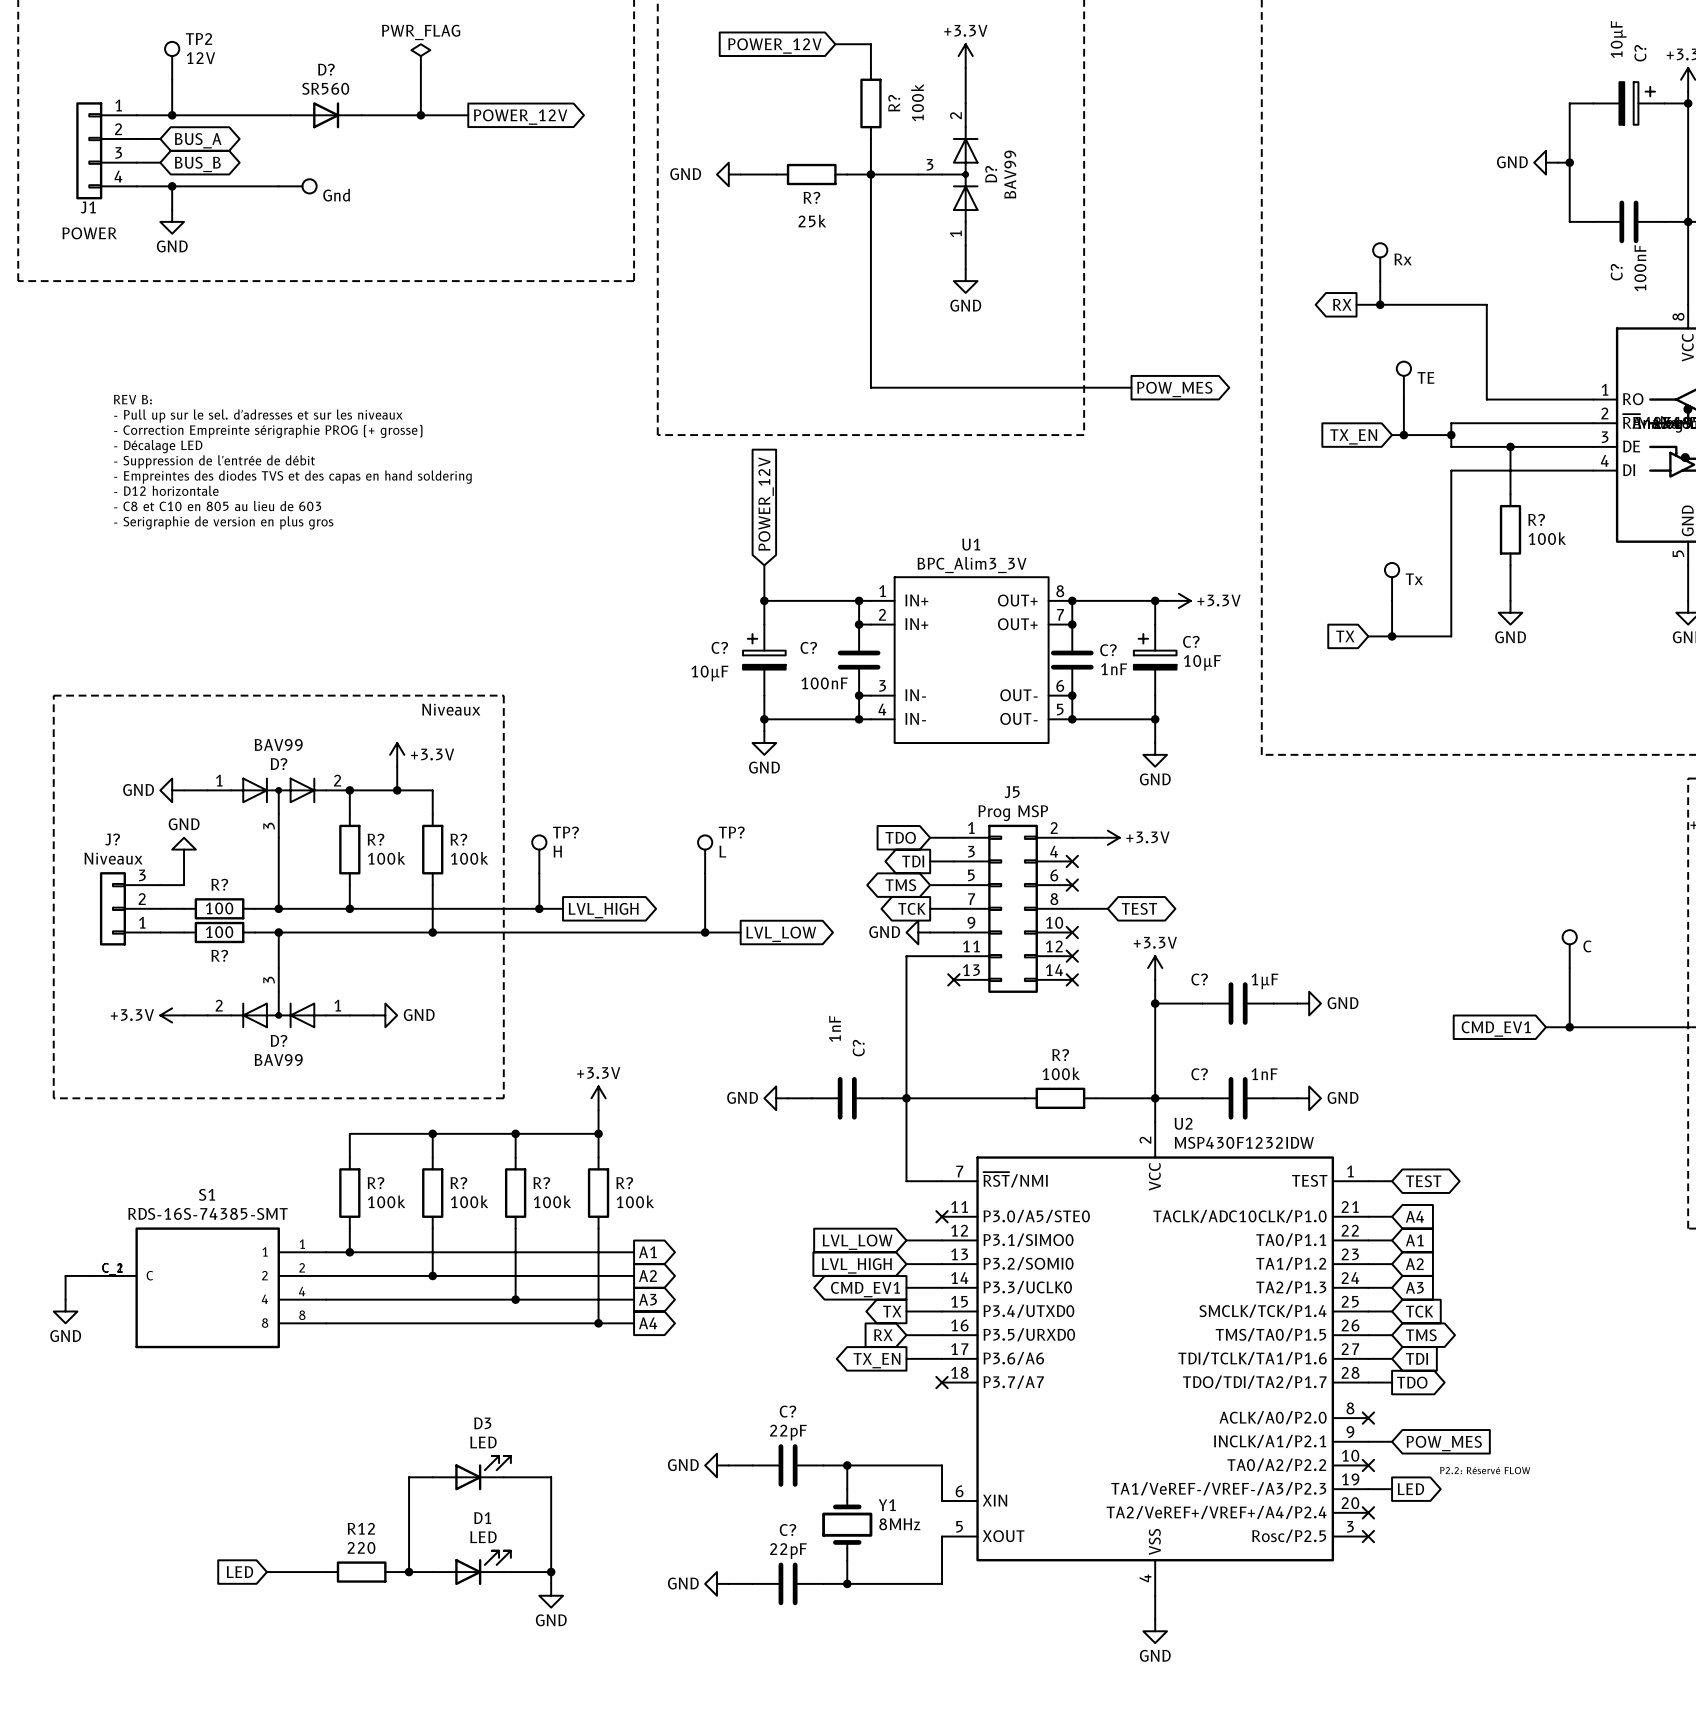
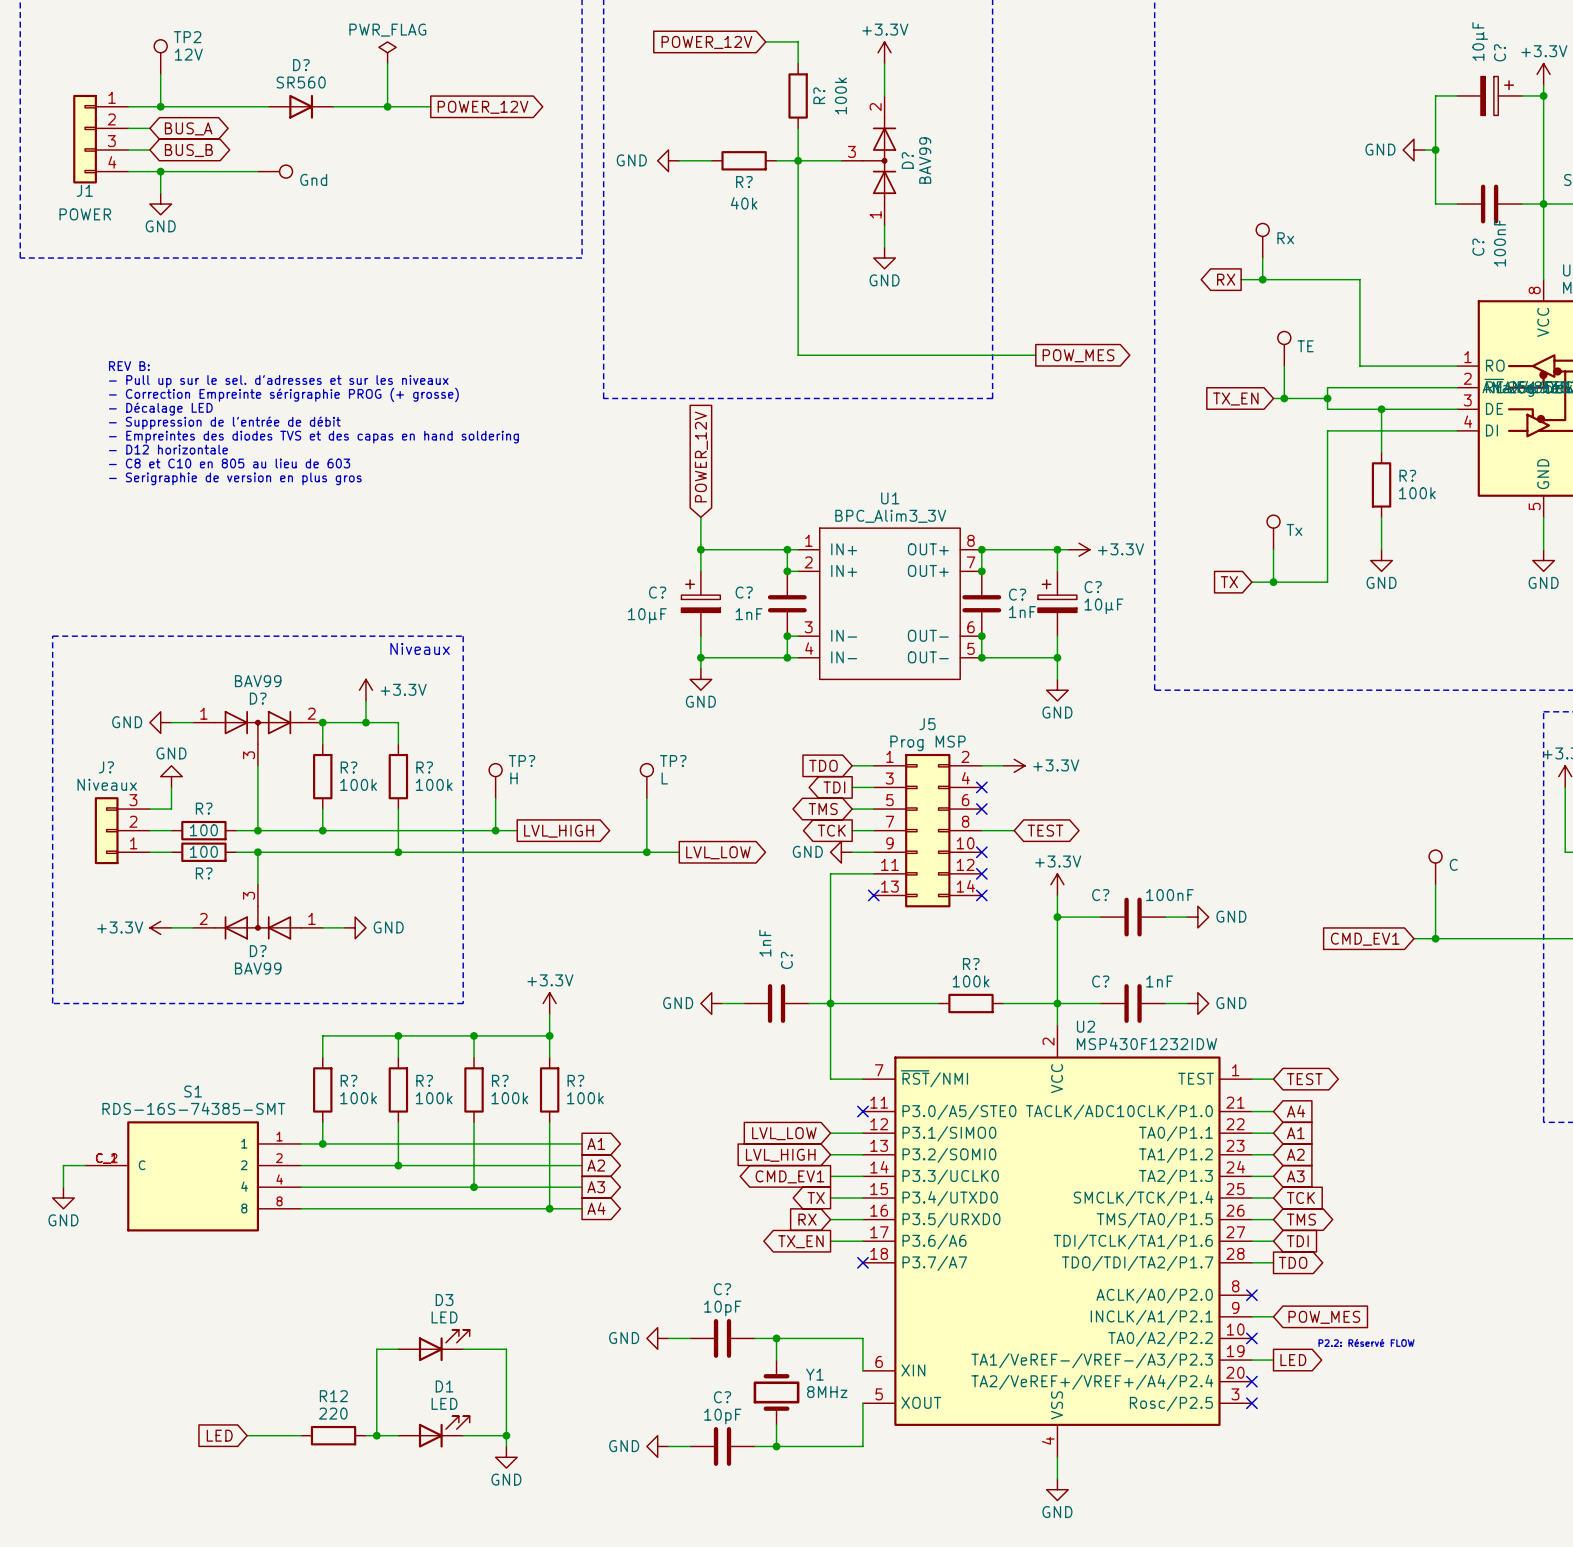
R? value: 25k (812, 221) -> 40k (744, 203)
C? value: 100nF (824, 683) -> 1nF (749, 614)
C? value: 1µF (1264, 981) -> 100nF (1169, 895)
C? value: 22pF (788, 1432) -> 10pF (722, 1308)
C? value: 22pF (788, 1551) -> 10pF (722, 1416)

